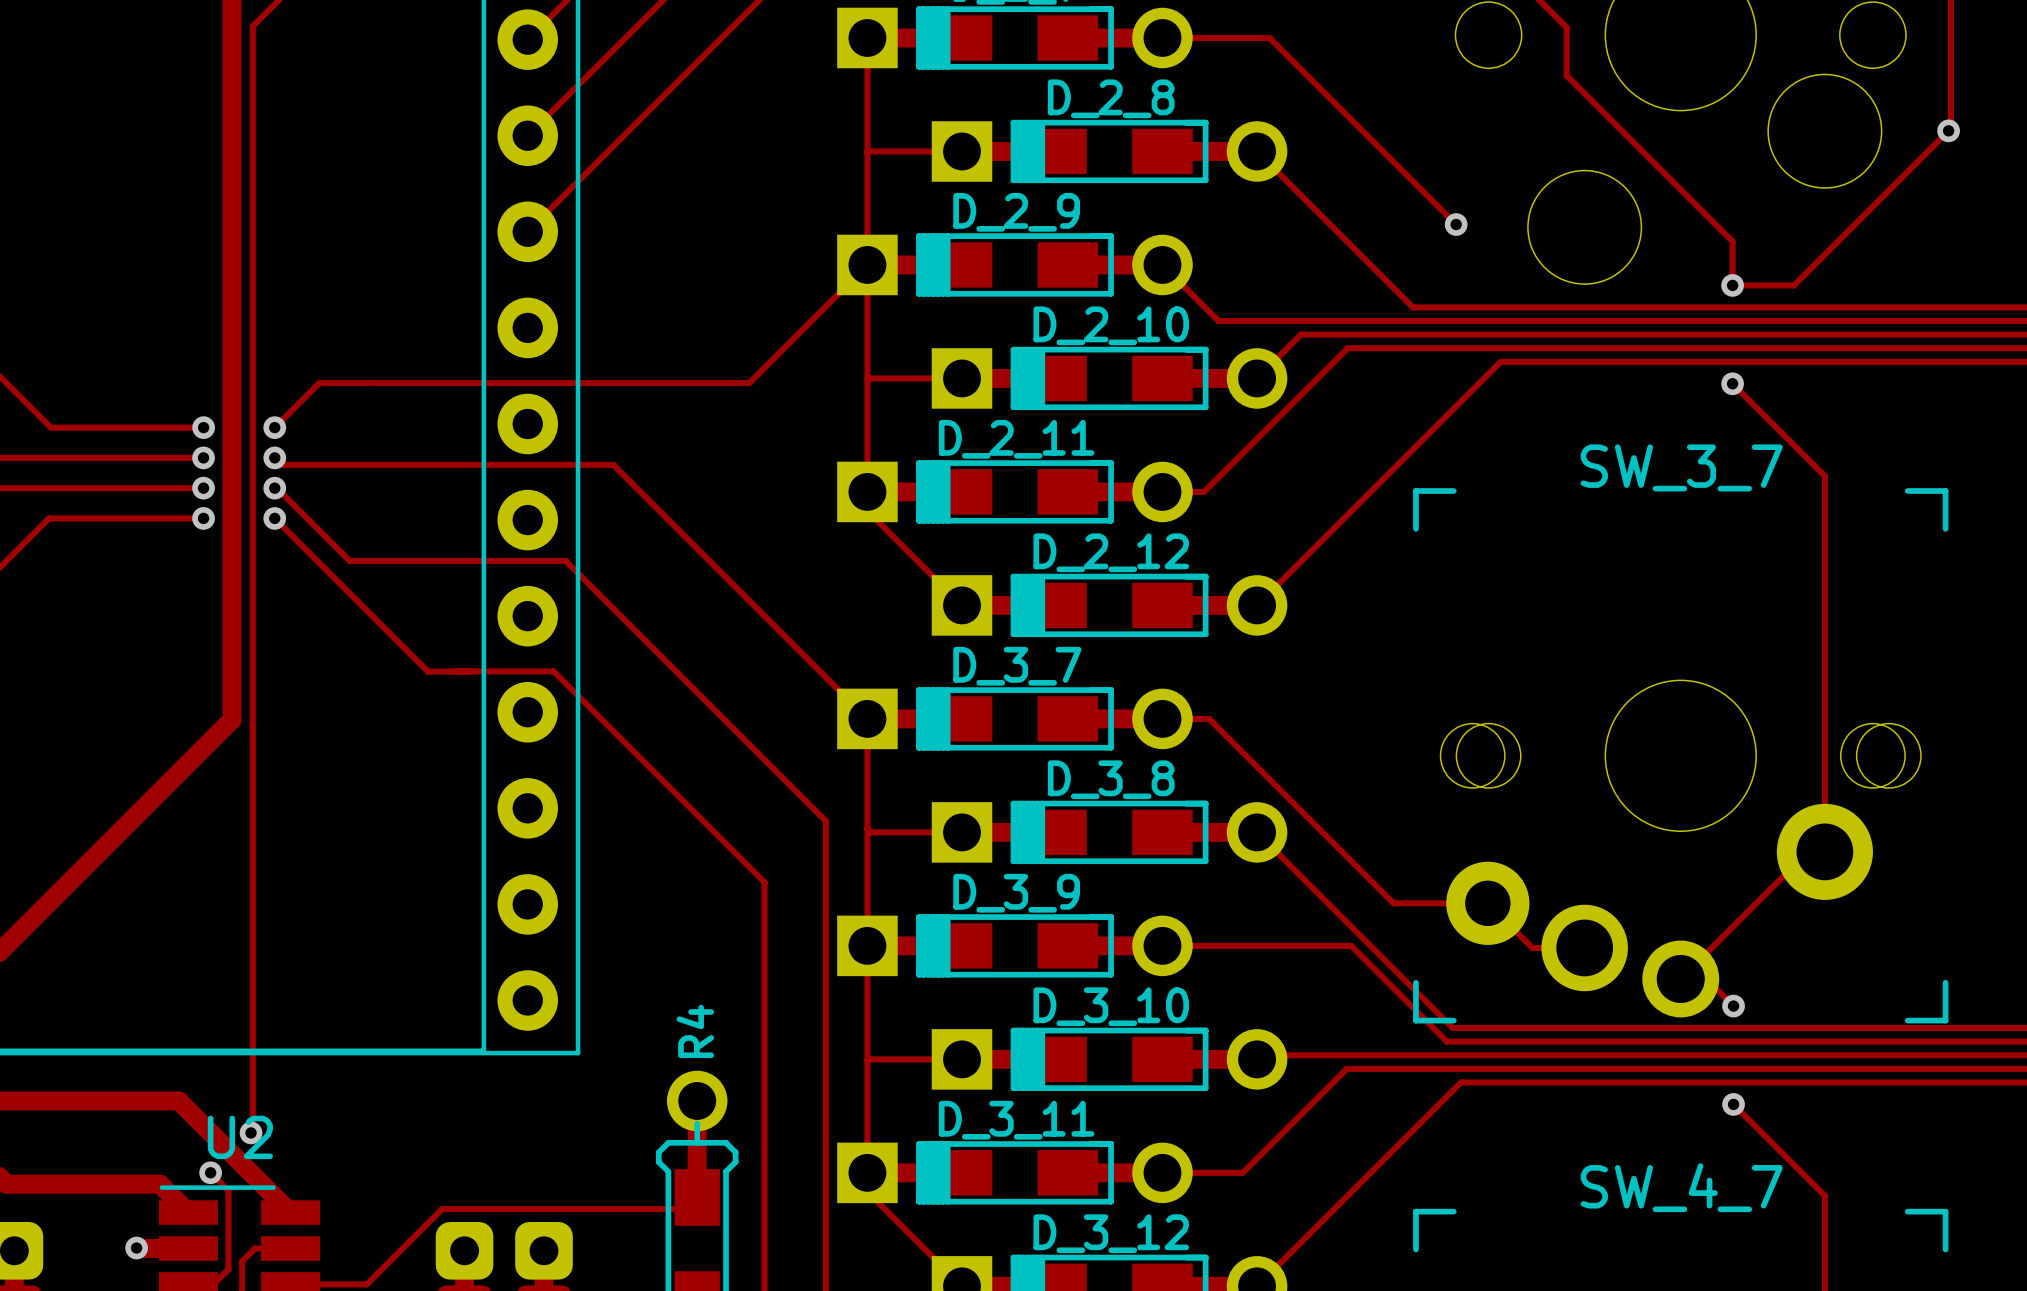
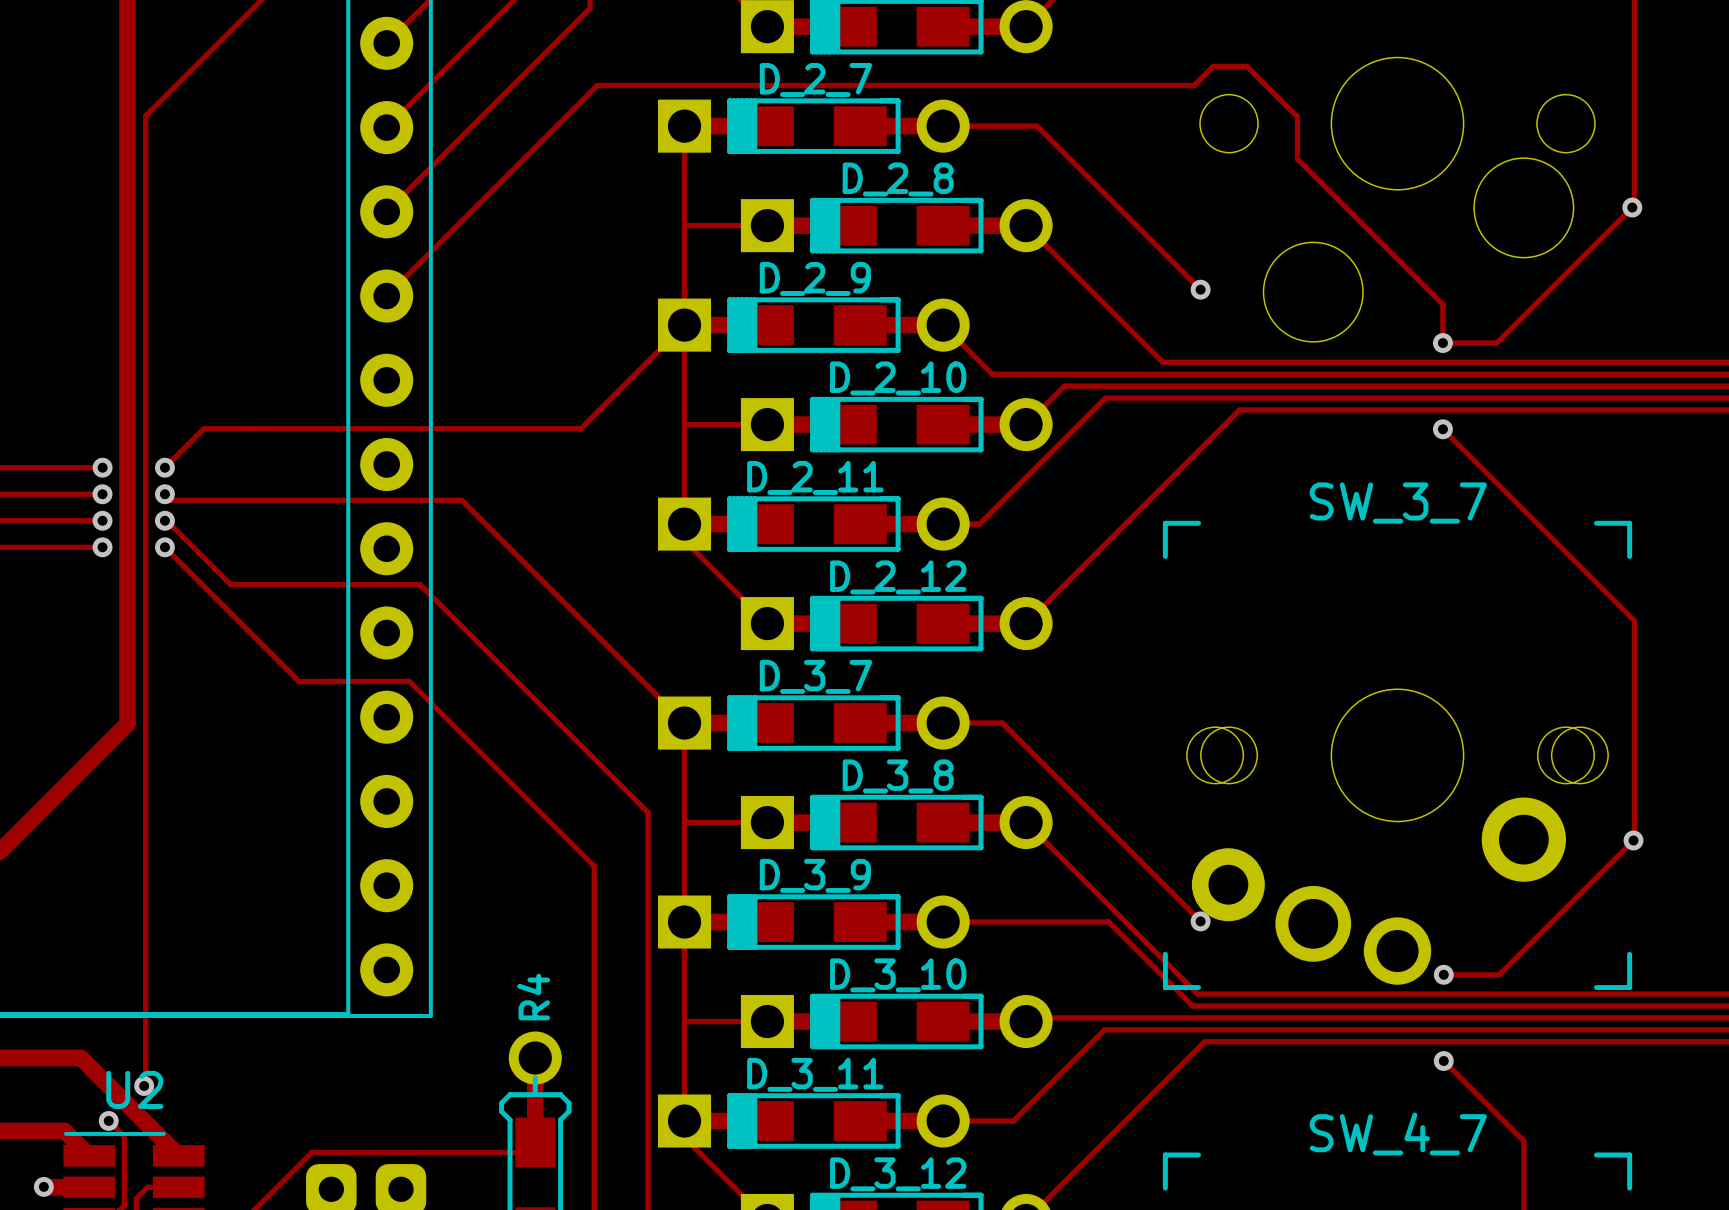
track: (1824, 476) (1824, 851) (1807, 851) (1680, 978) (1706, 978) (1733, 1006) -> (1523, 510) (1634, 620) (1634, 839) (1499, 974) (1443, 974)
track: (1209, 718) (1393, 903) (1487, 903) (1532, 947) (1584, 947) -> (984, 723) (1002, 723) (1204, 925)
via: none -> (1633, 840)
via: none -> (1200, 921)

